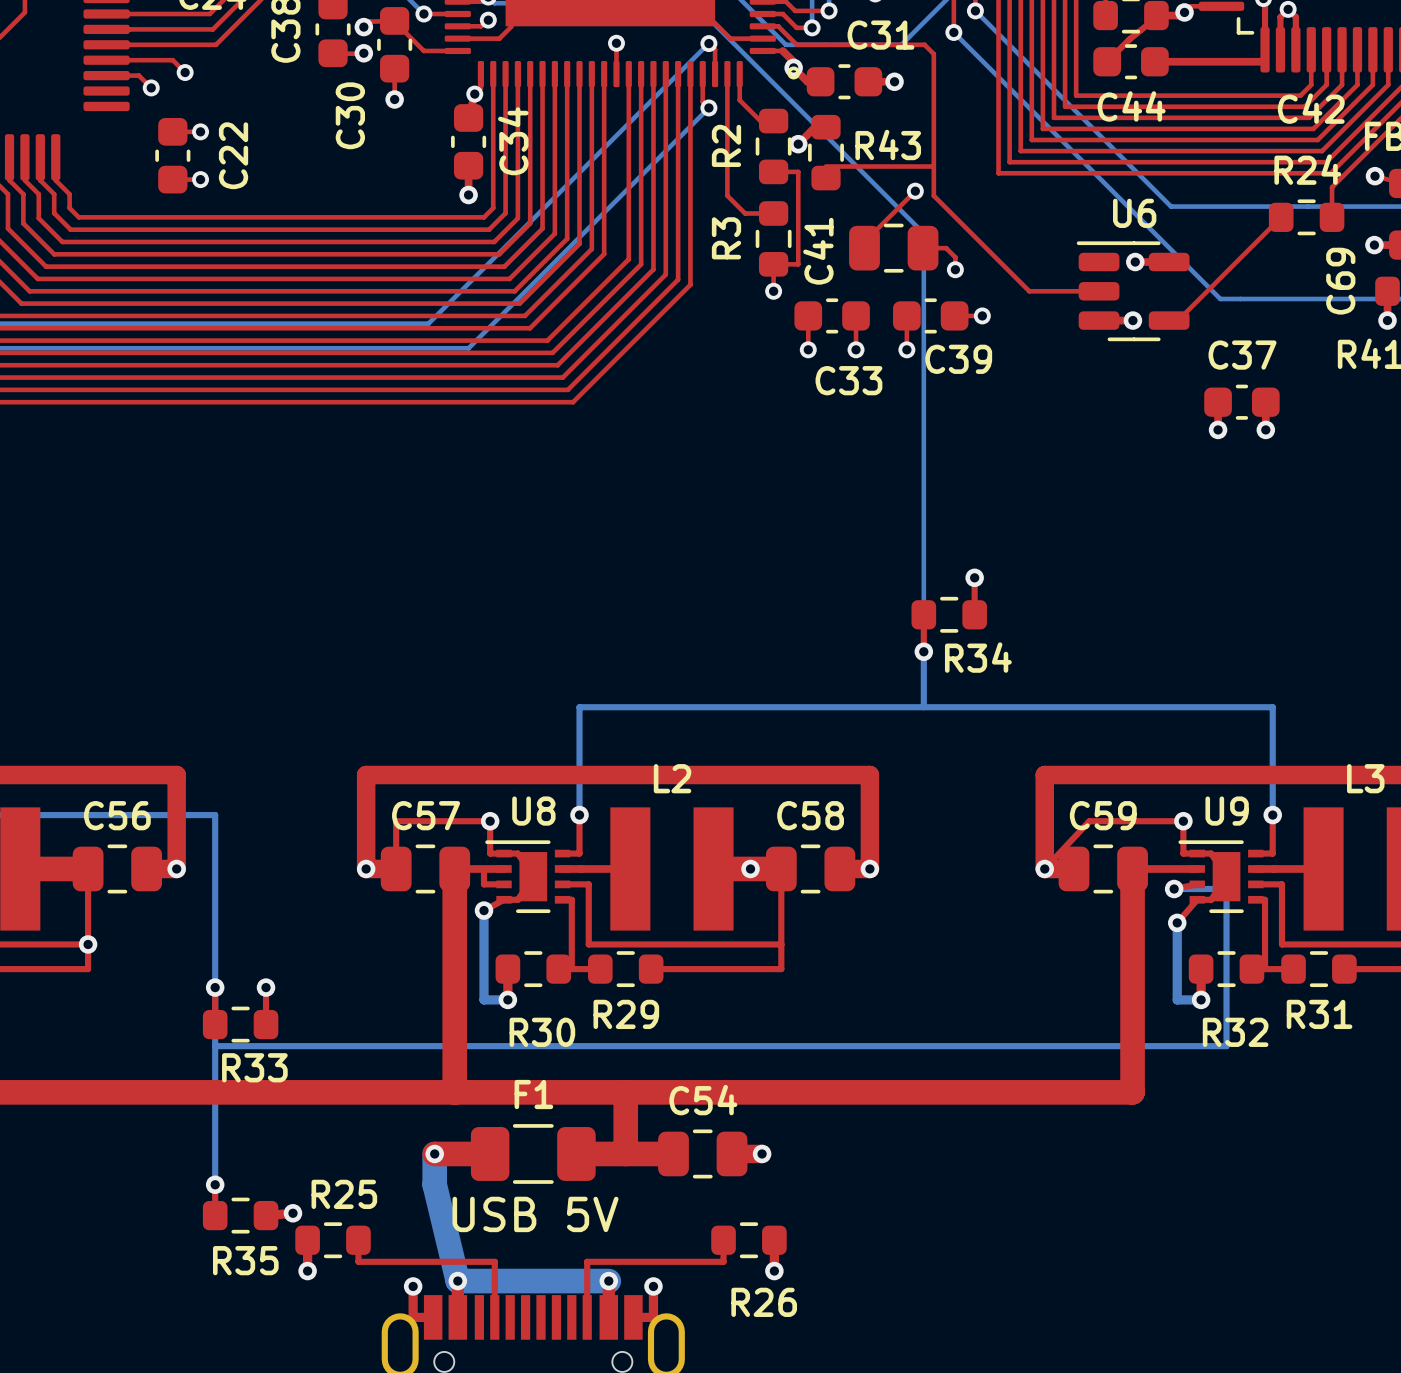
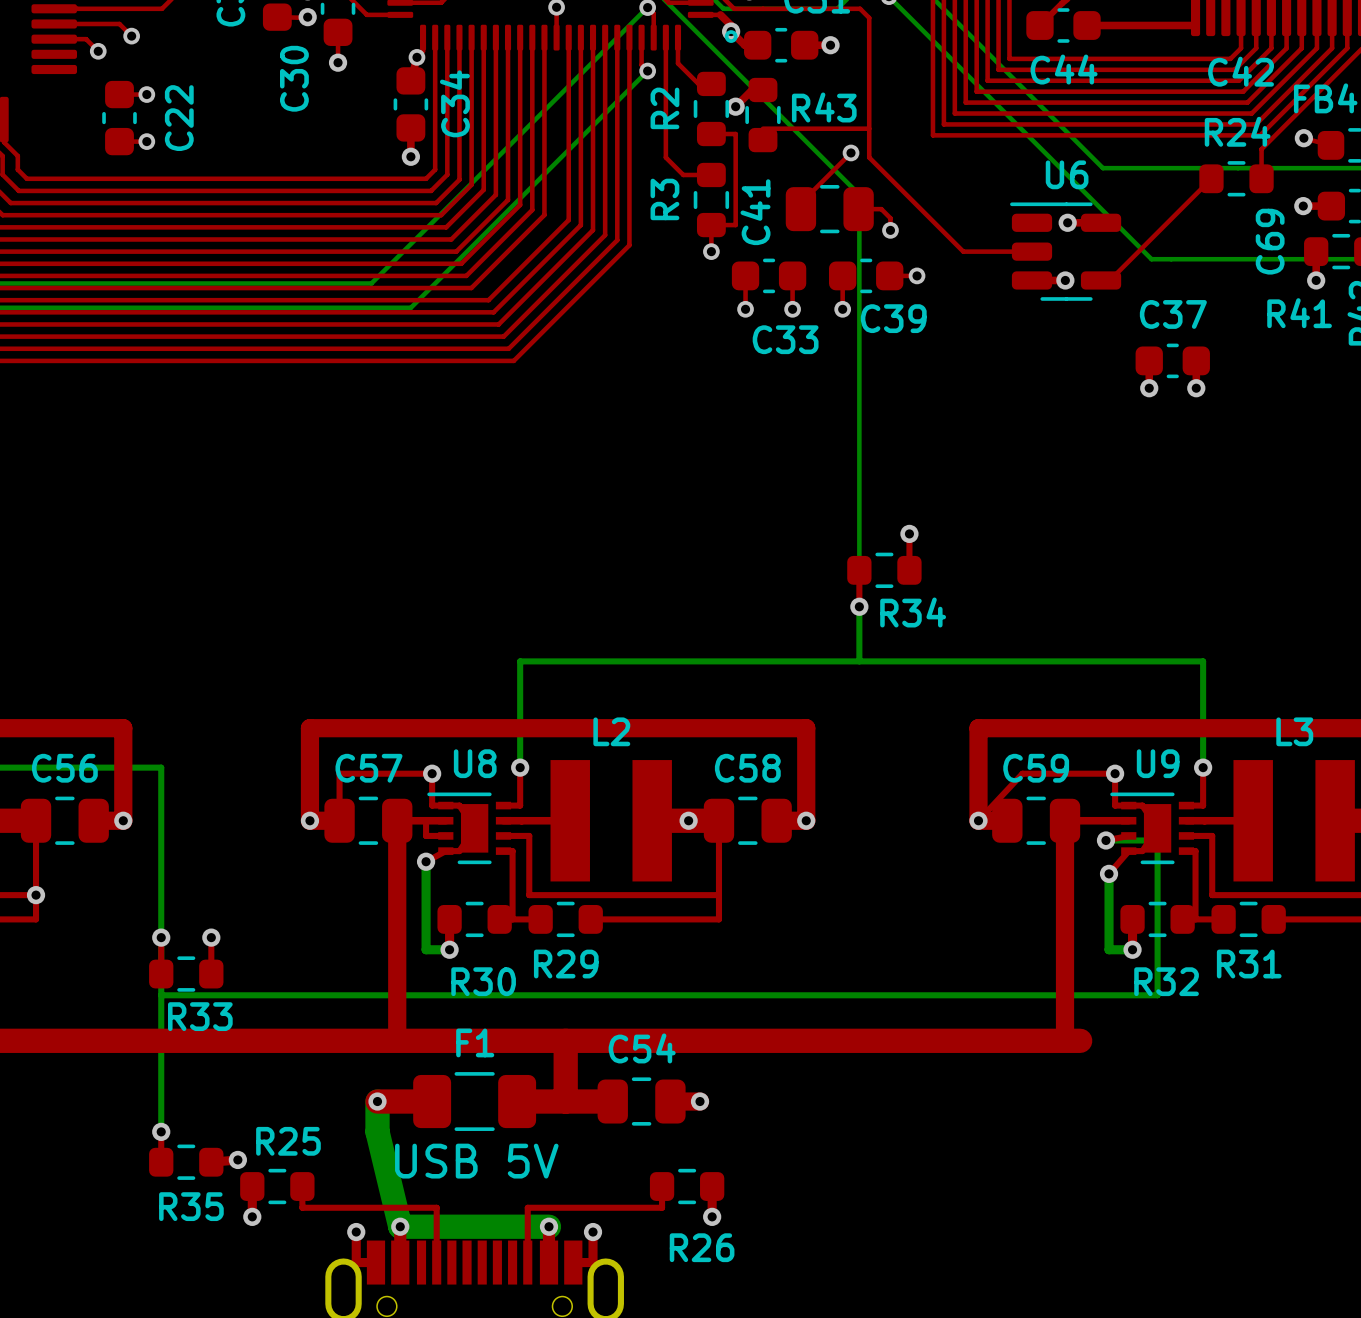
top track width: thick (454, 868) (454, 1092) -> thin (397, 820) (397, 1040)
top track width: thick (1132, 868) (1132, 1092) -> thin (1065, 820) (1065, 1040)
top track: none -> (1065, 1040) (1080, 1040)

